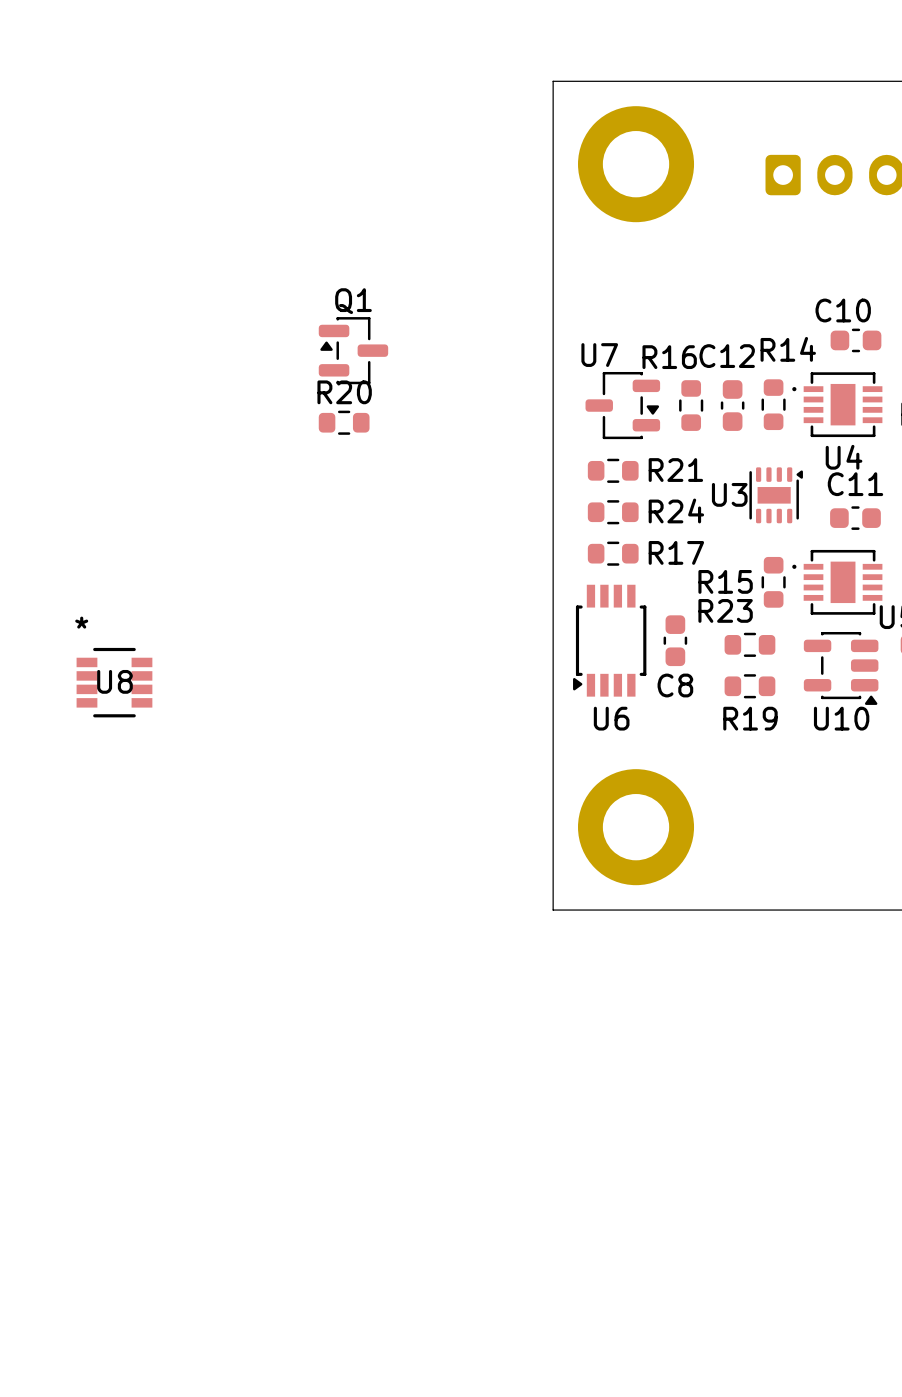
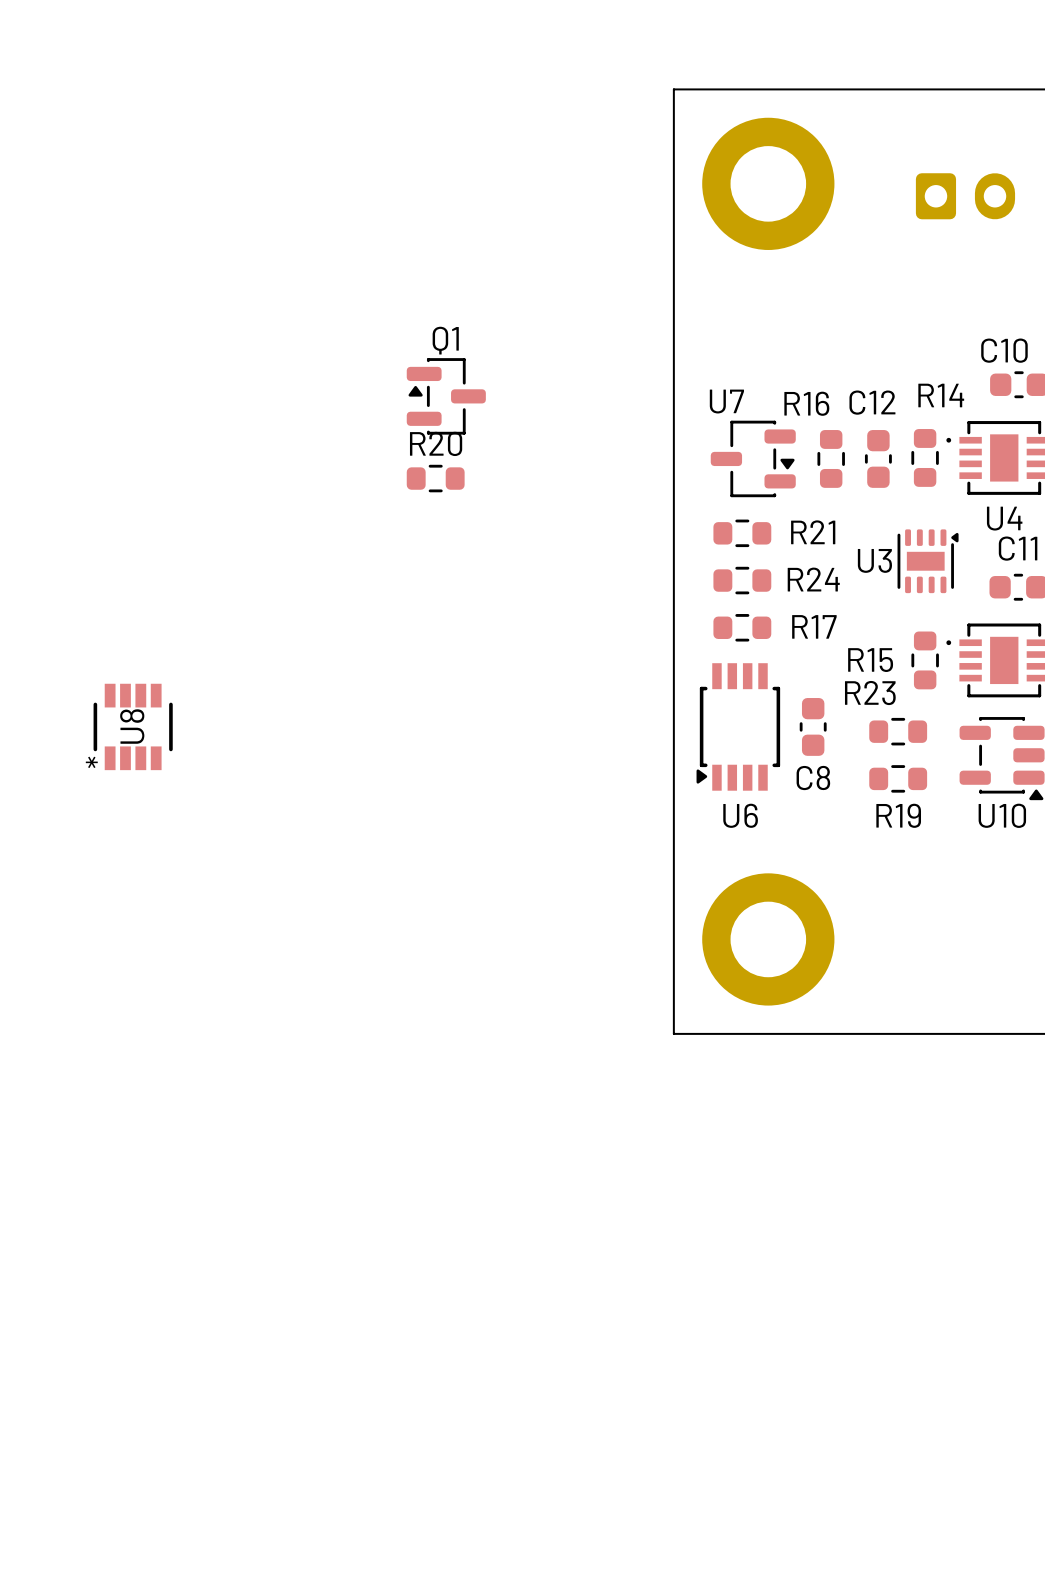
U8 footprint: [76, 647, 153, 718] -> [93, 683, 173, 771]

